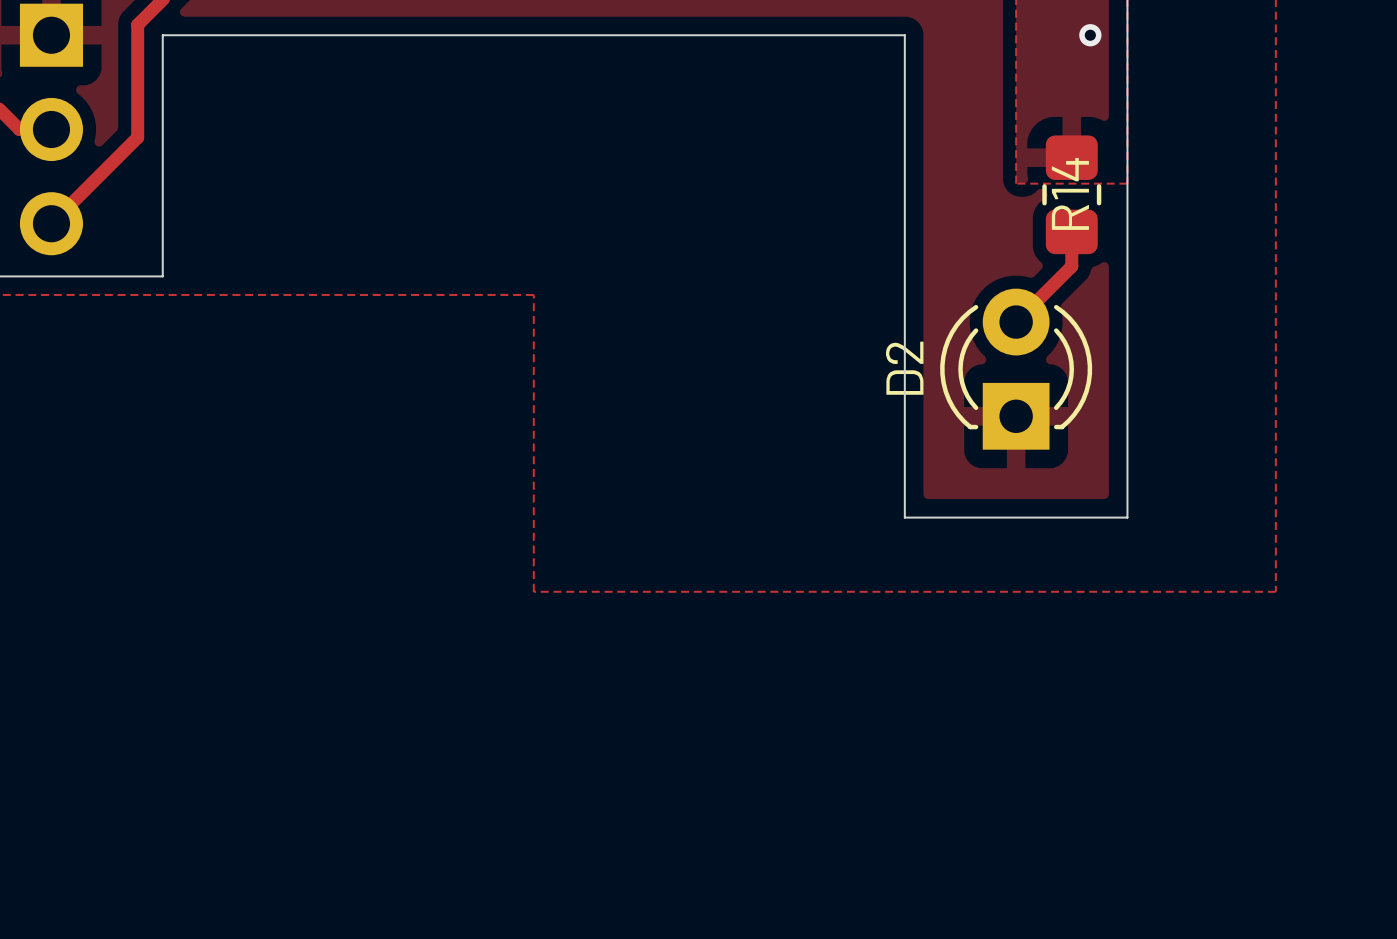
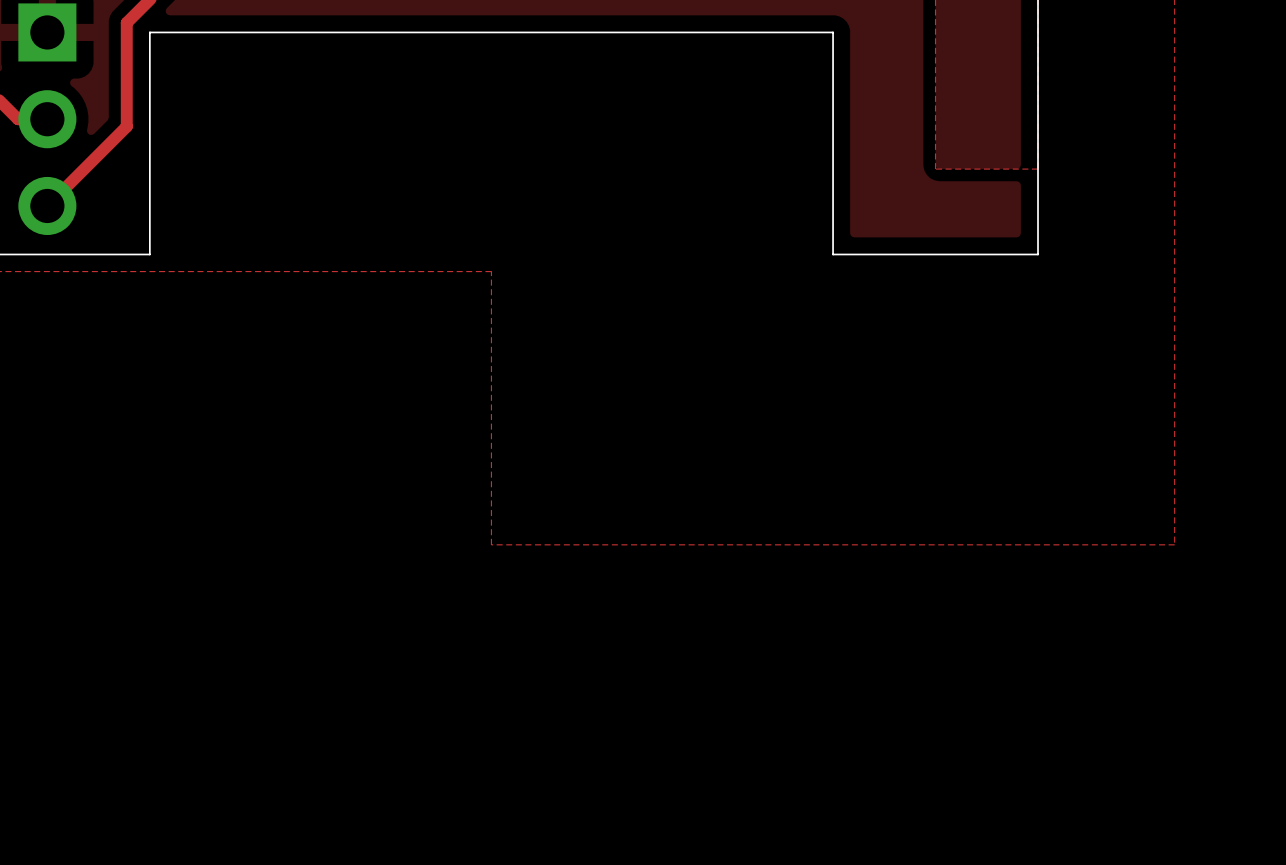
via: (1090, 35) -> none
R14: (1071, 194) -> none
track: (1071, 231) (1071, 266) (1016, 322) -> none
board edge: (904, 276) (904, 517) (1127, 517) (1127, 276) -> (833, 254) (1038, 254)
D2: (1016, 369) -> none

